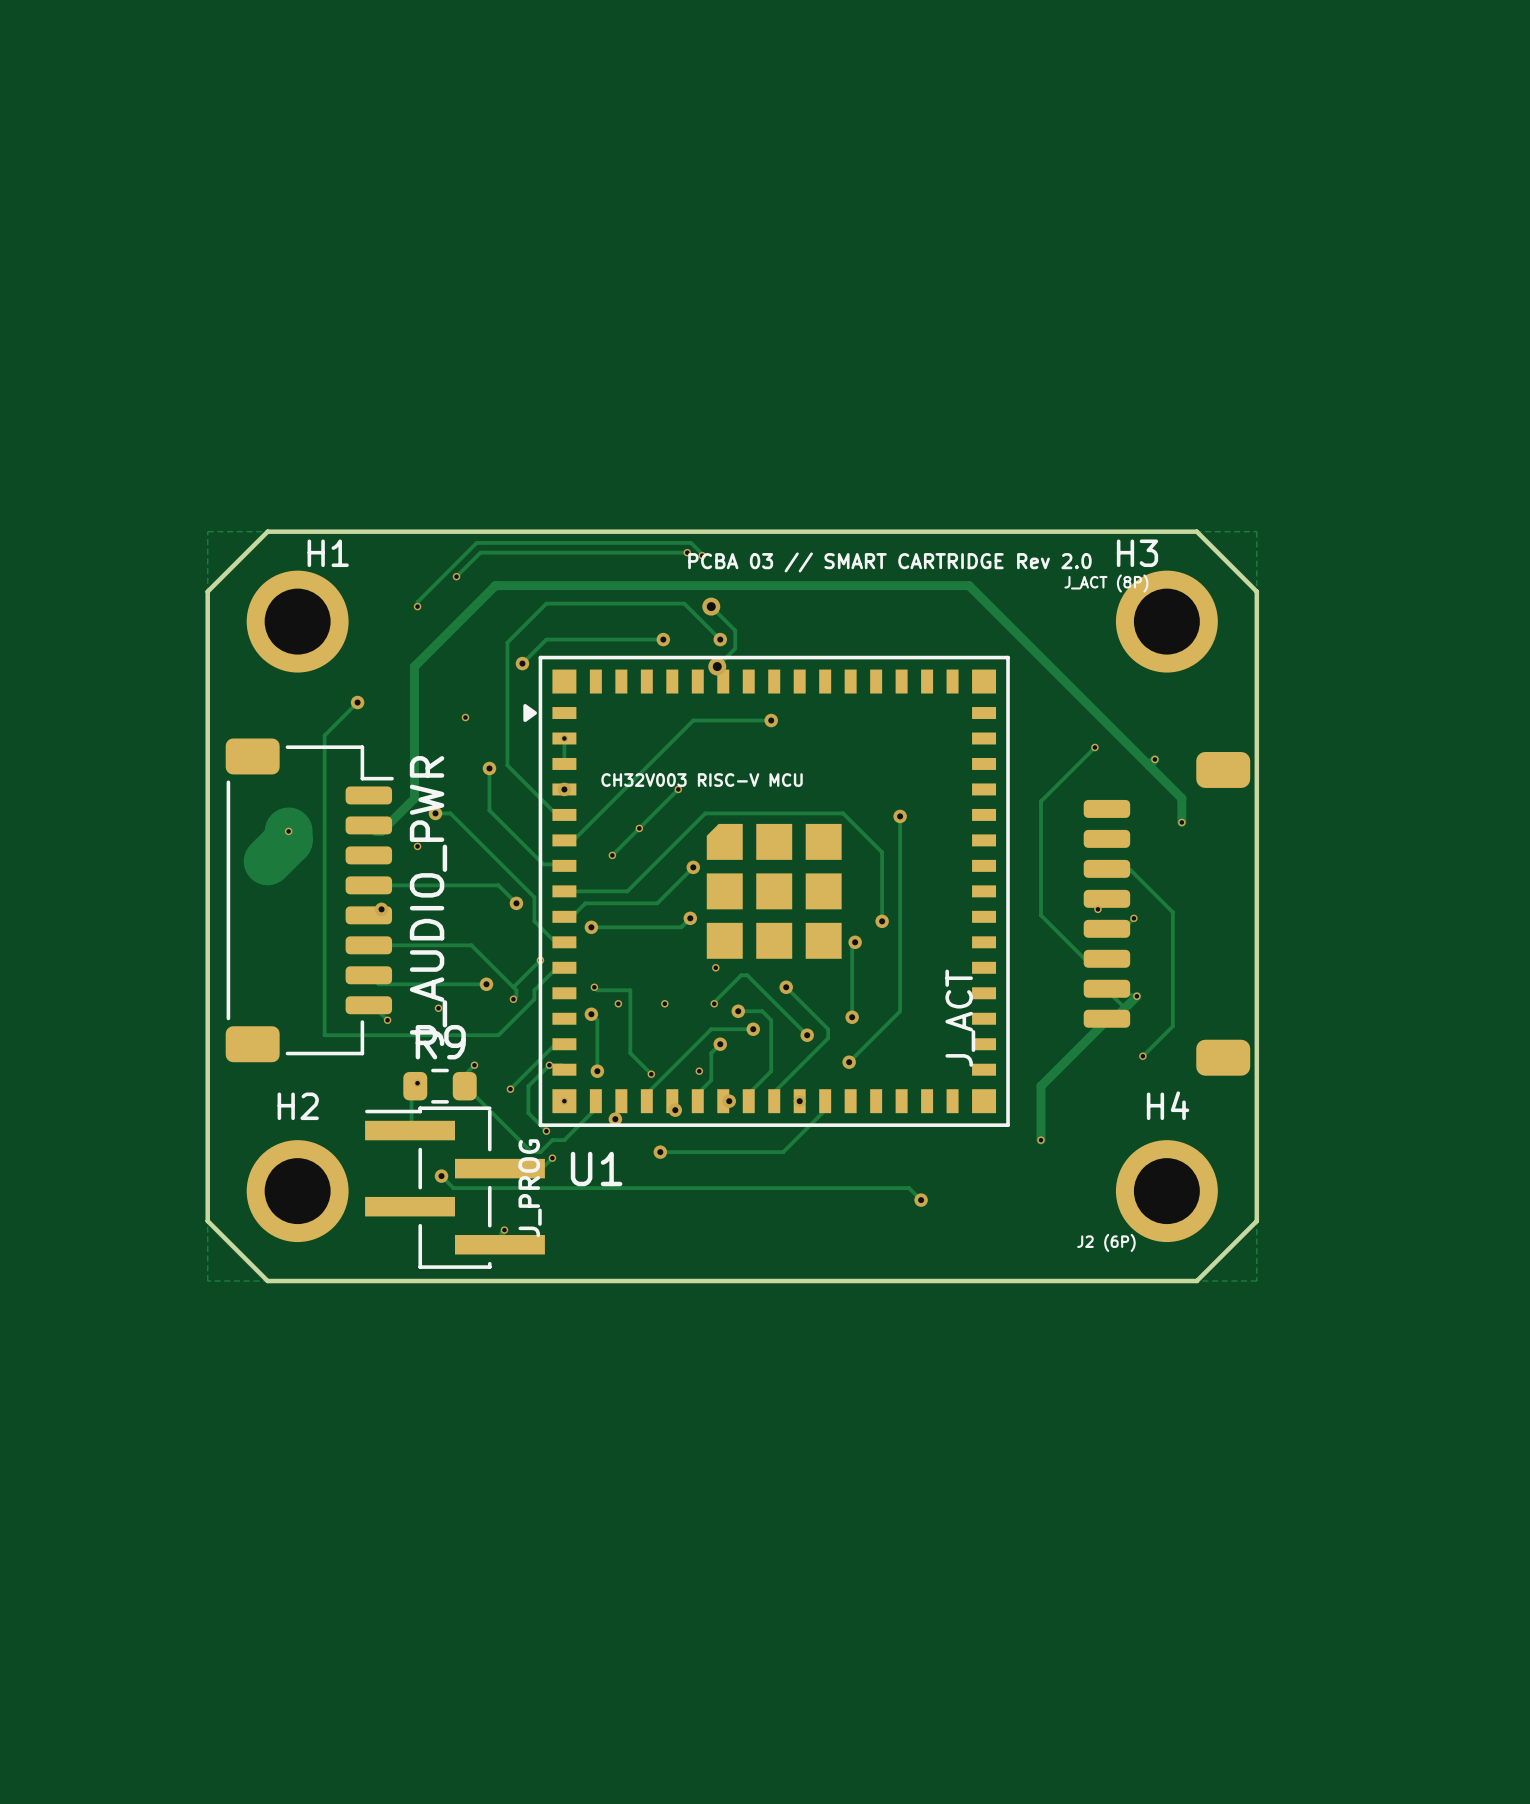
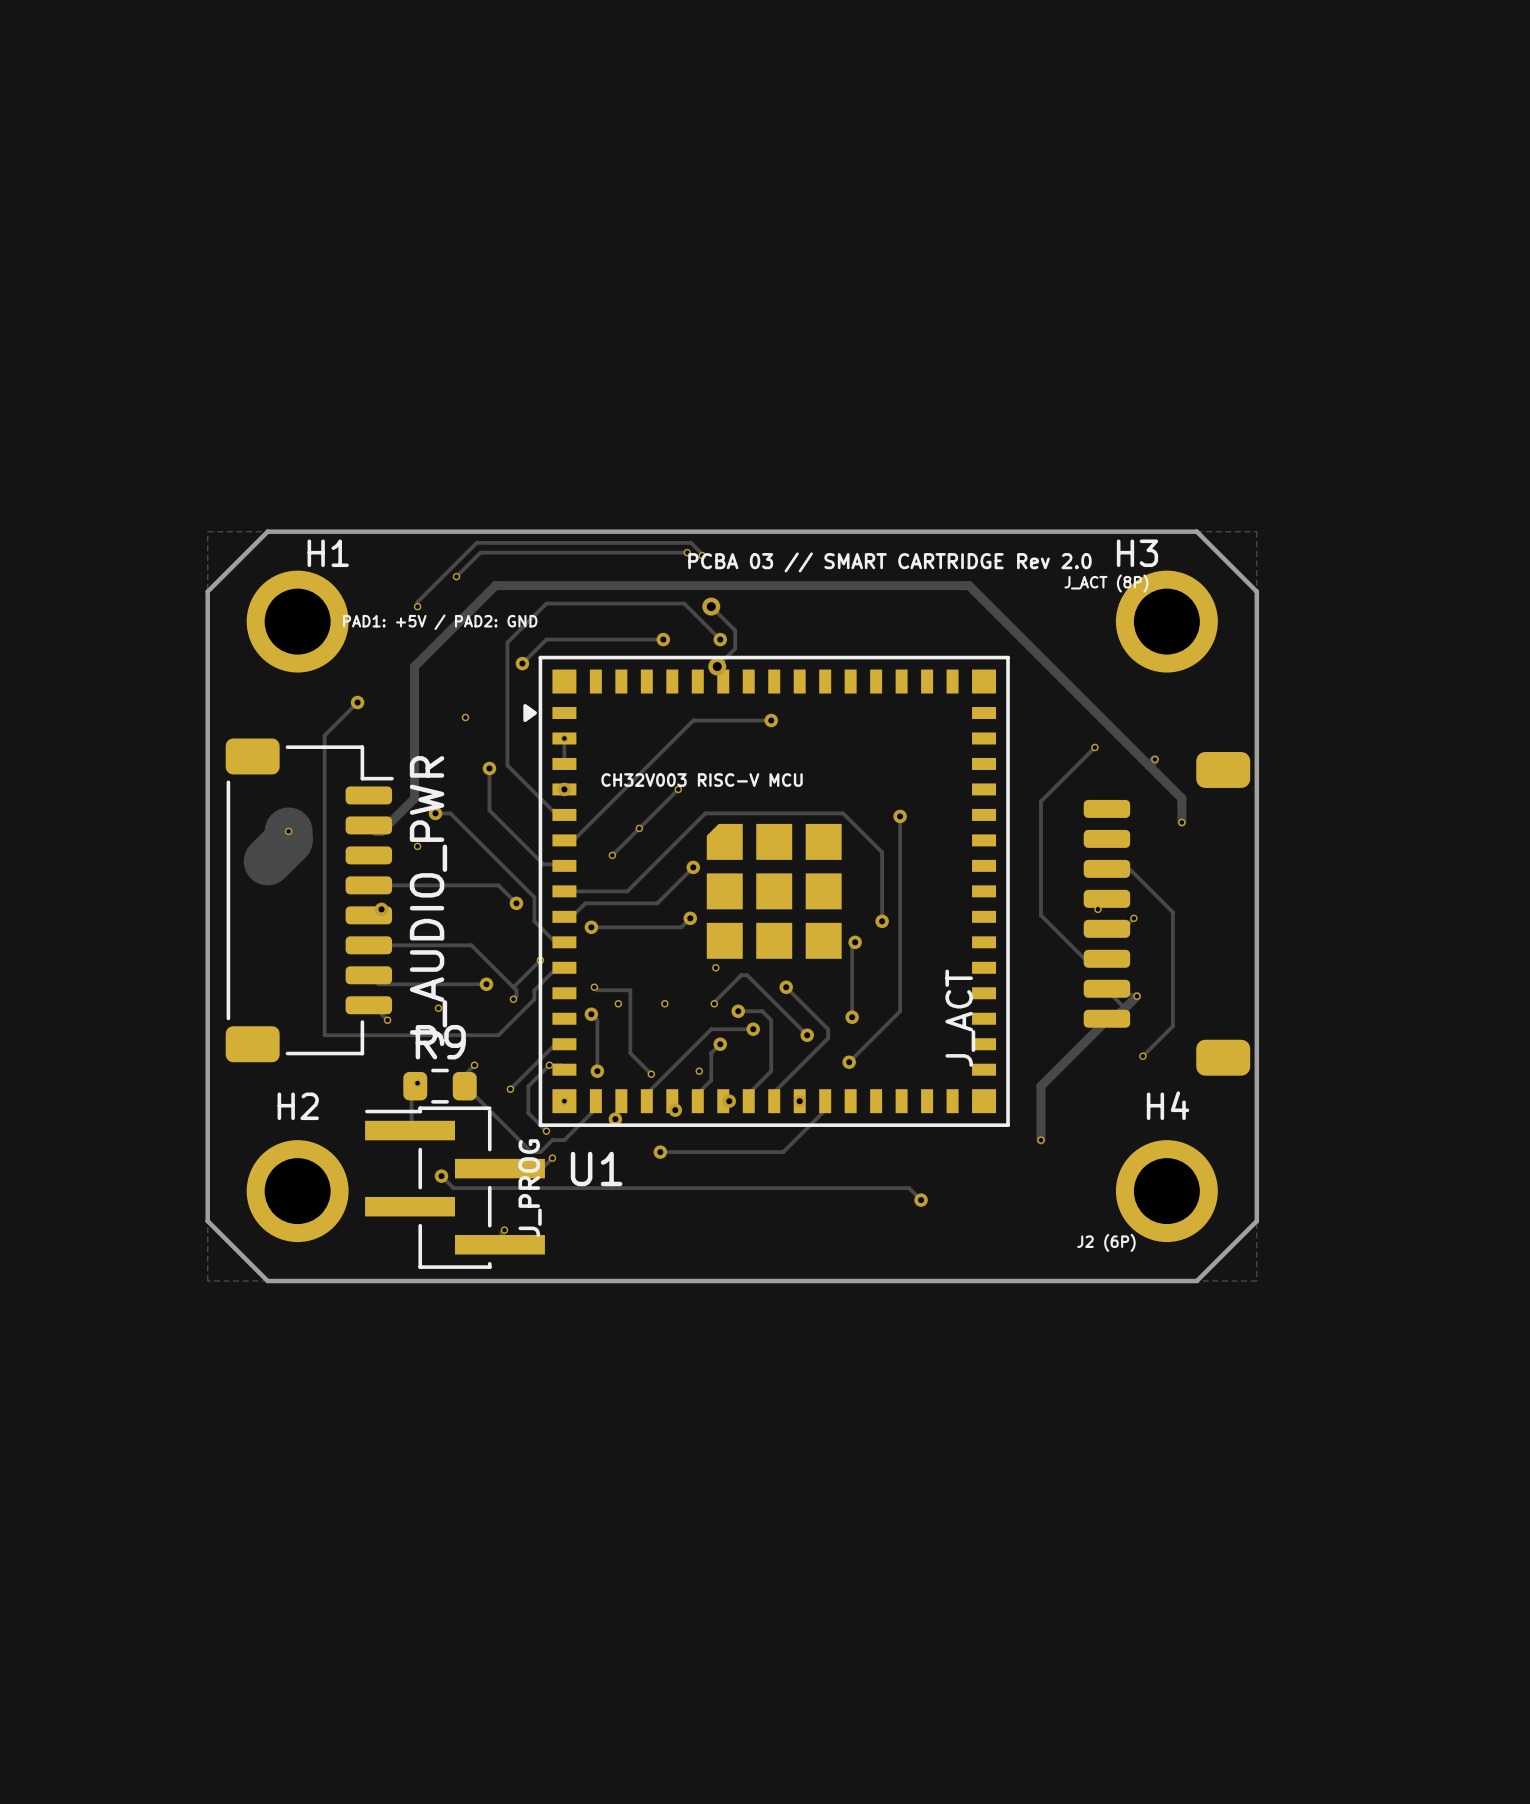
text: none -> PAD1: +5V / PAD2: GND (440, 622)

